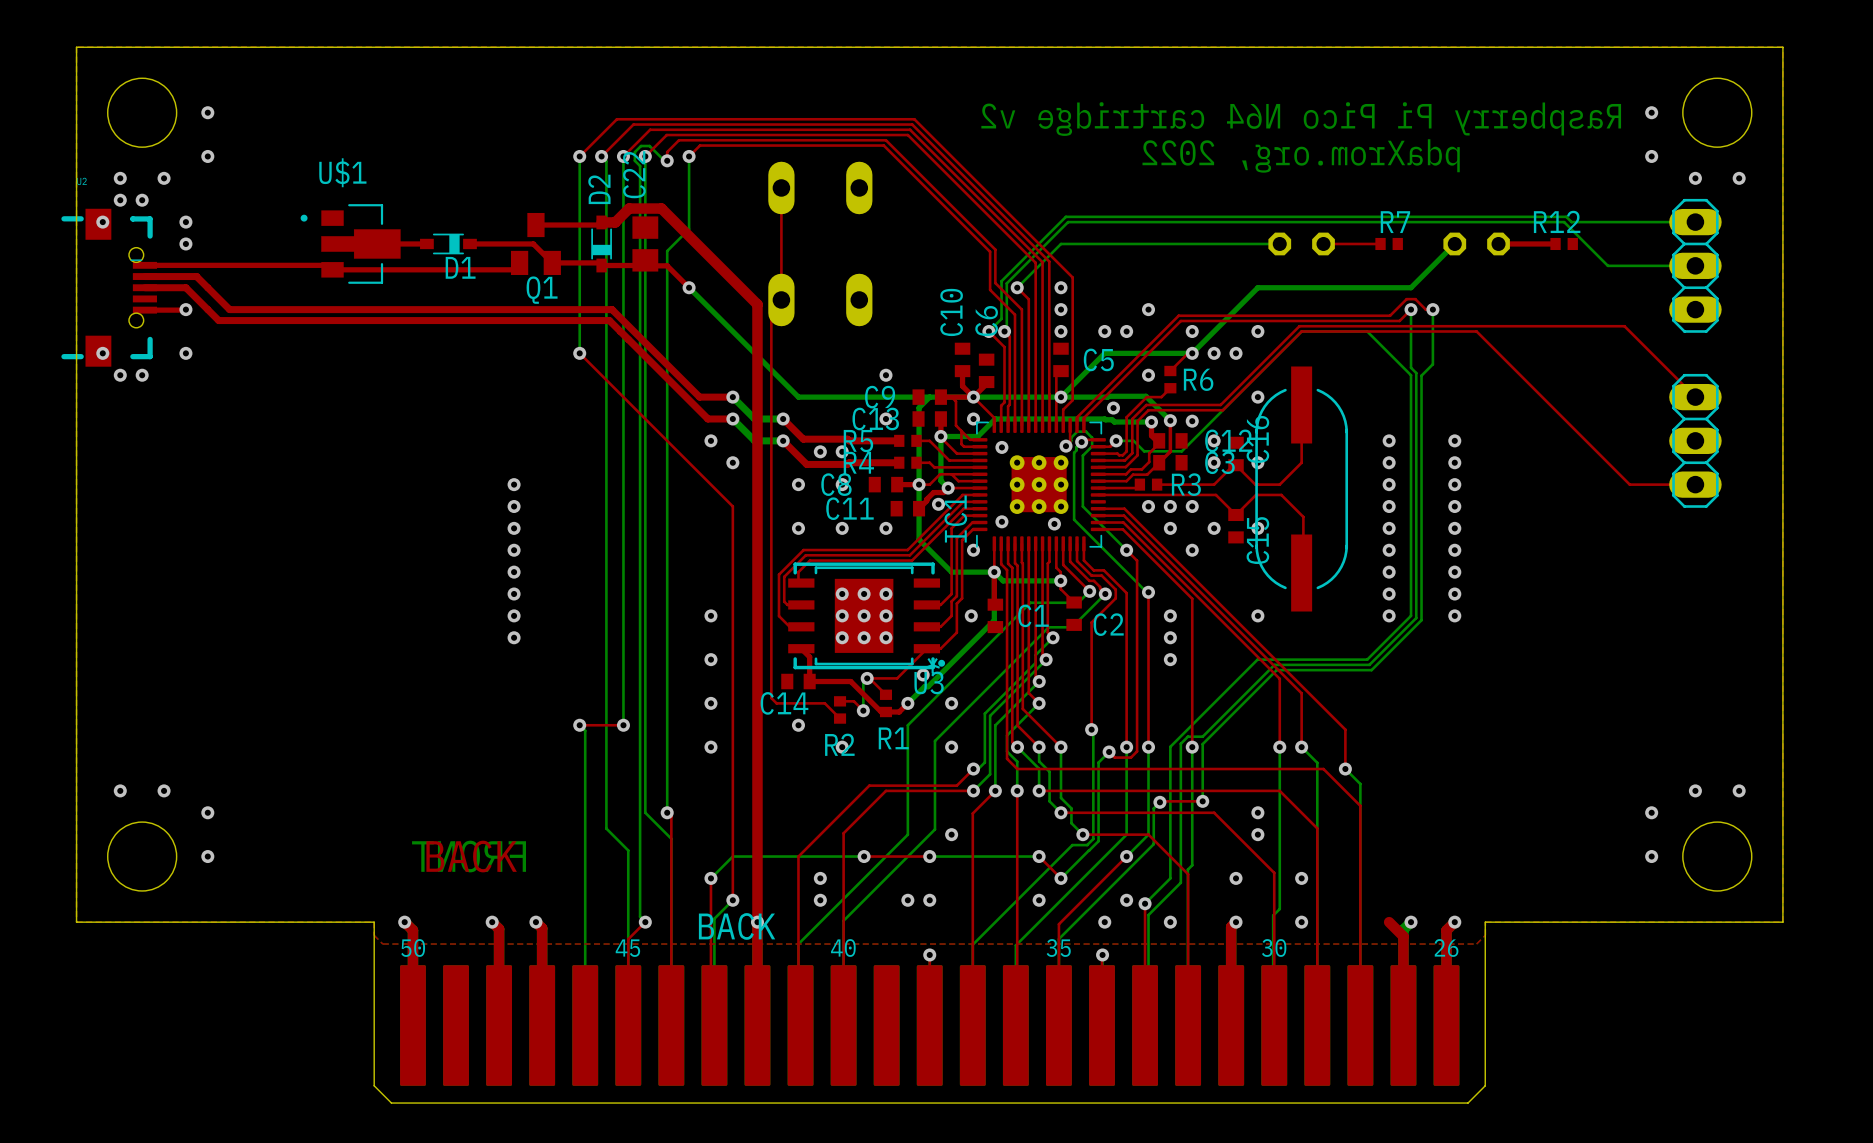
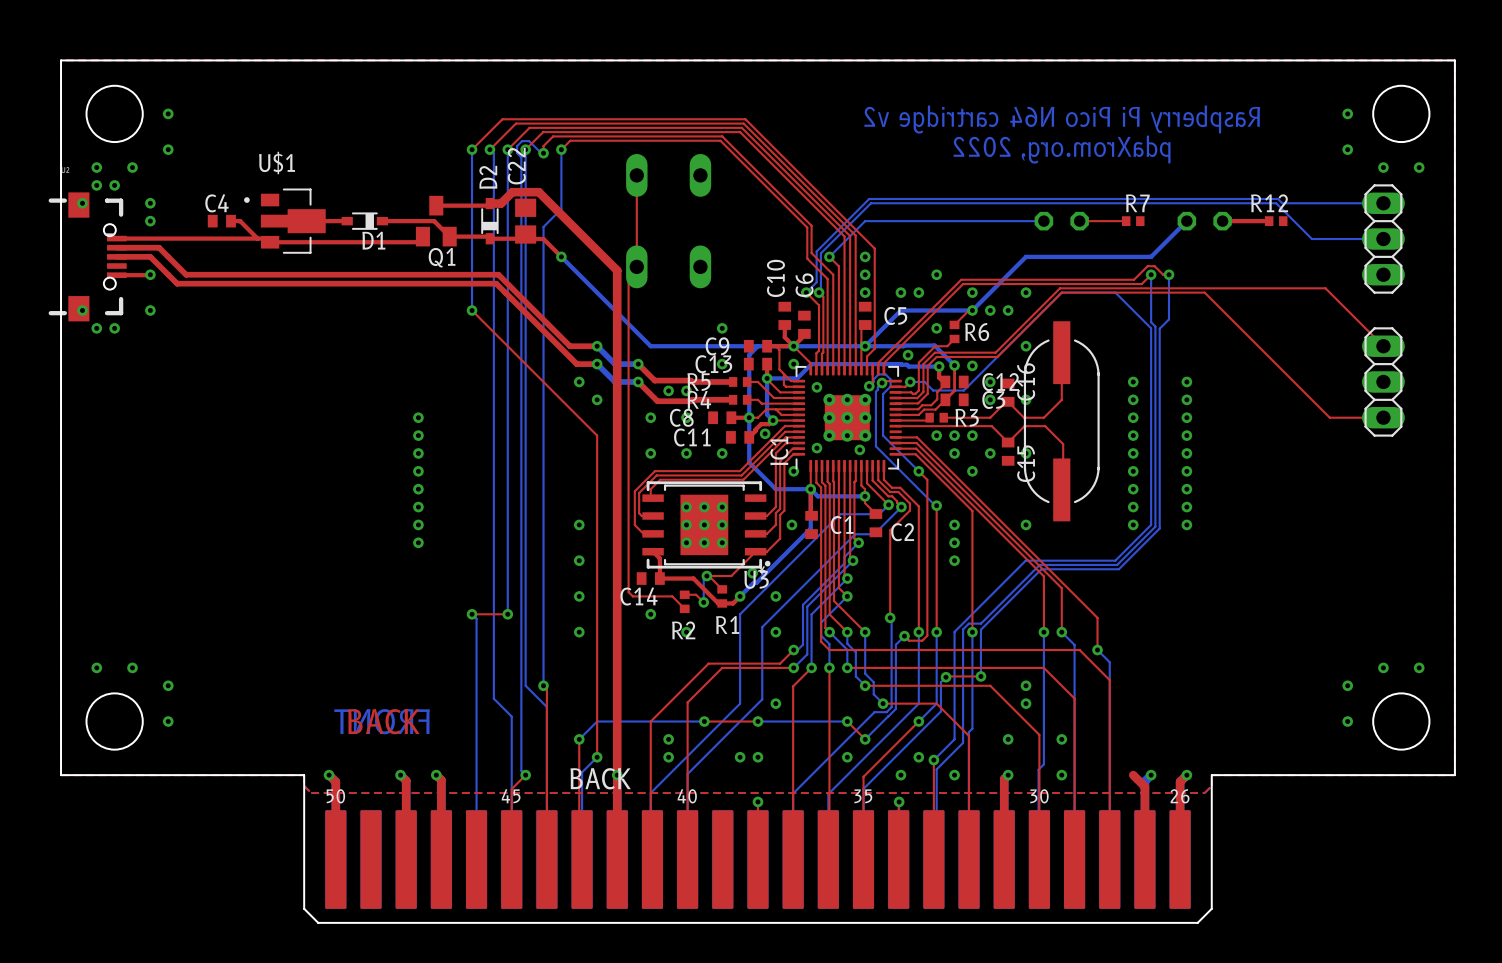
C4: none -> (221, 221)
top track: none -> (231, 221) (240, 221) (257, 238)

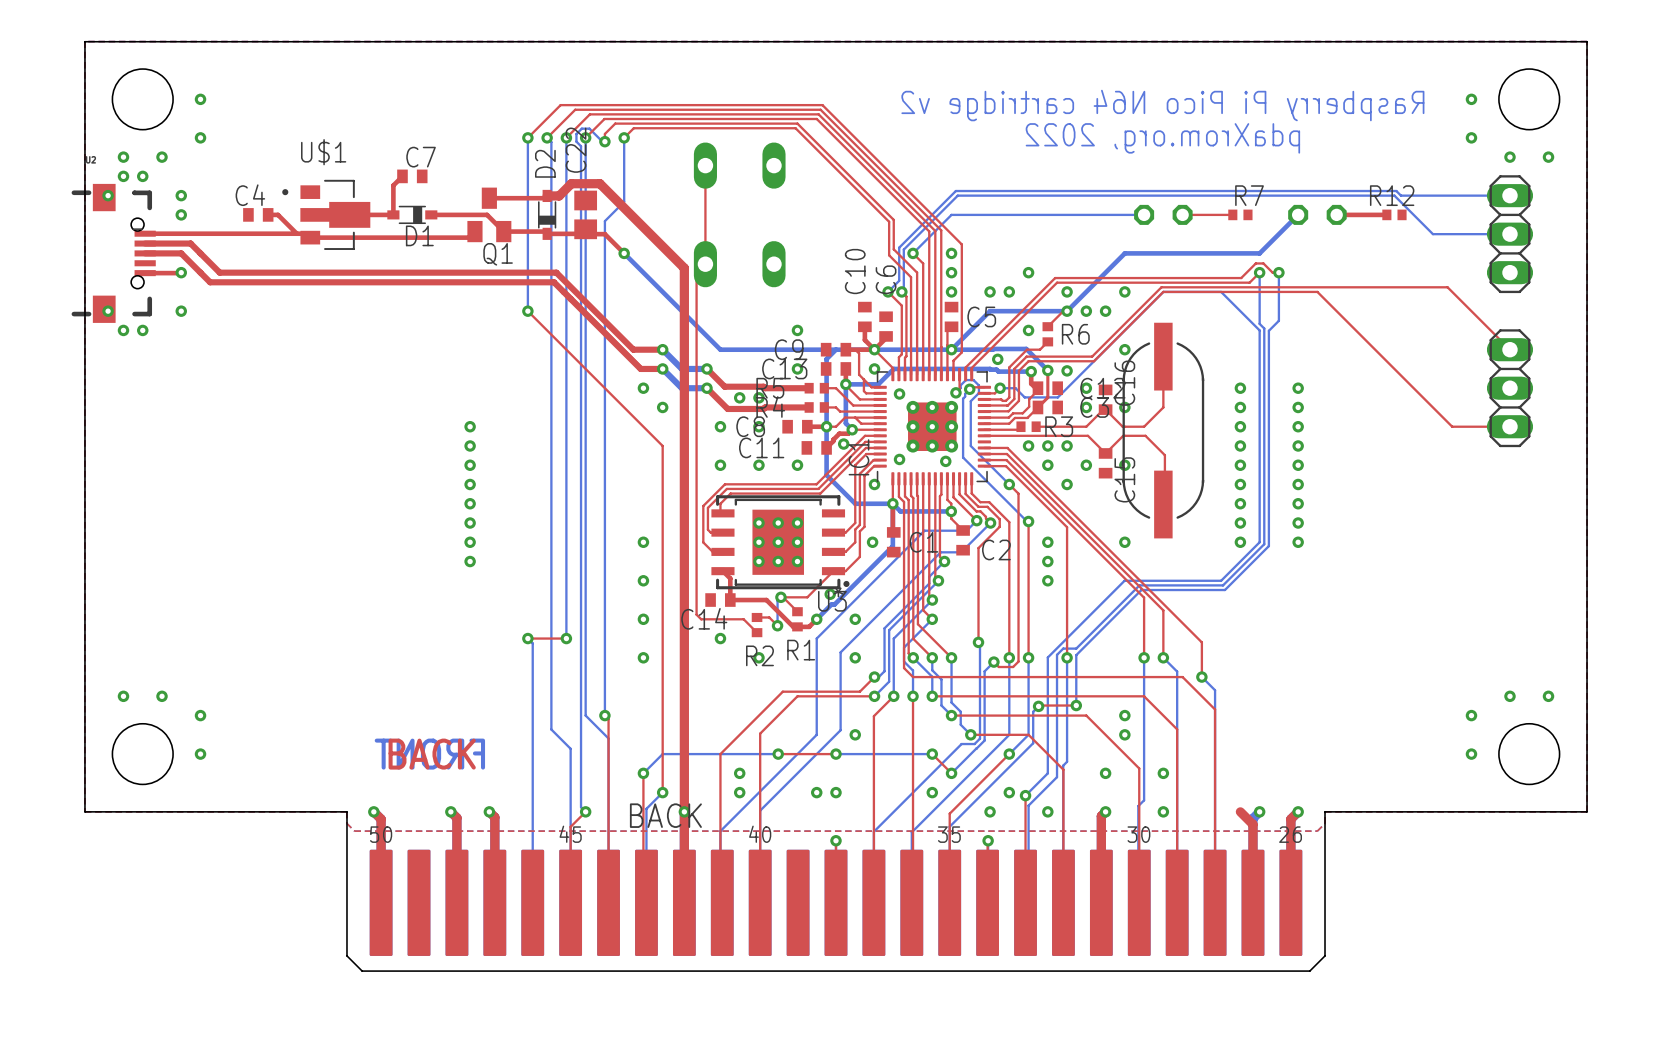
top track: none -> (402, 176) (393, 185) (393, 214)
C7: none -> (412, 176)

